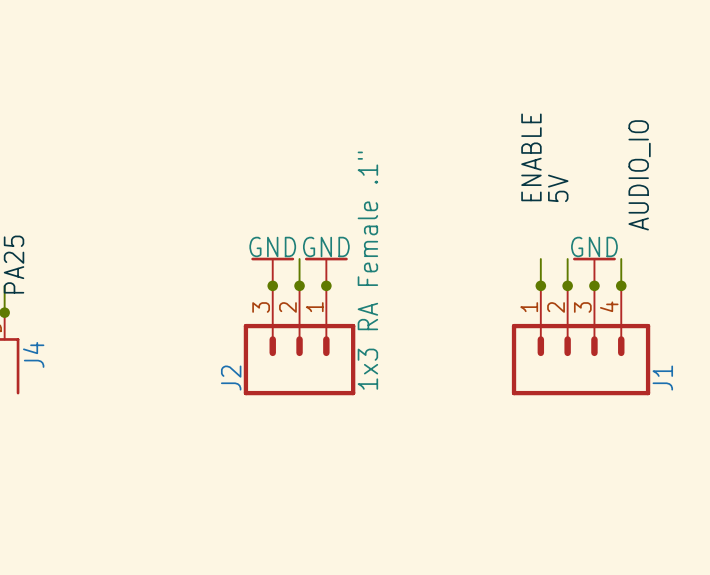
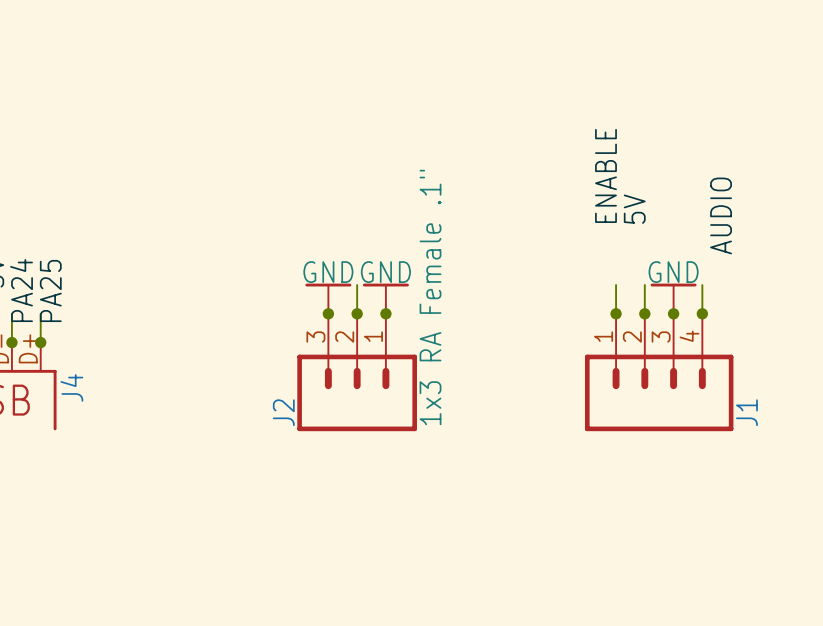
label: AUDIO_IO (639, 175) -> AUDIO (721, 215)

